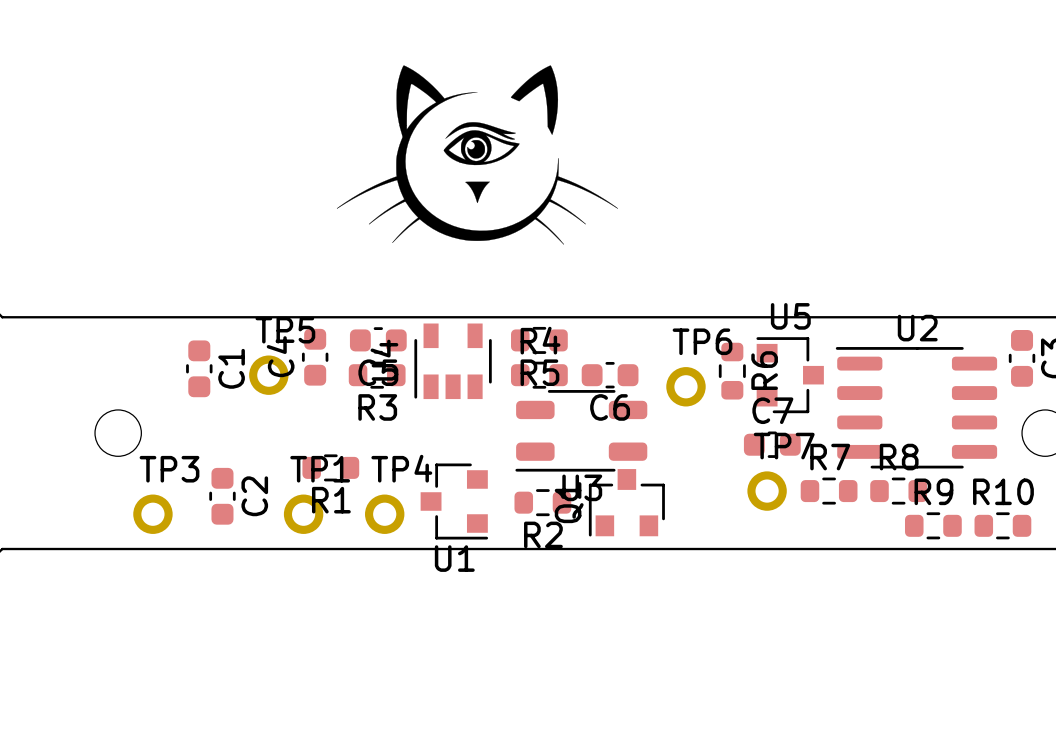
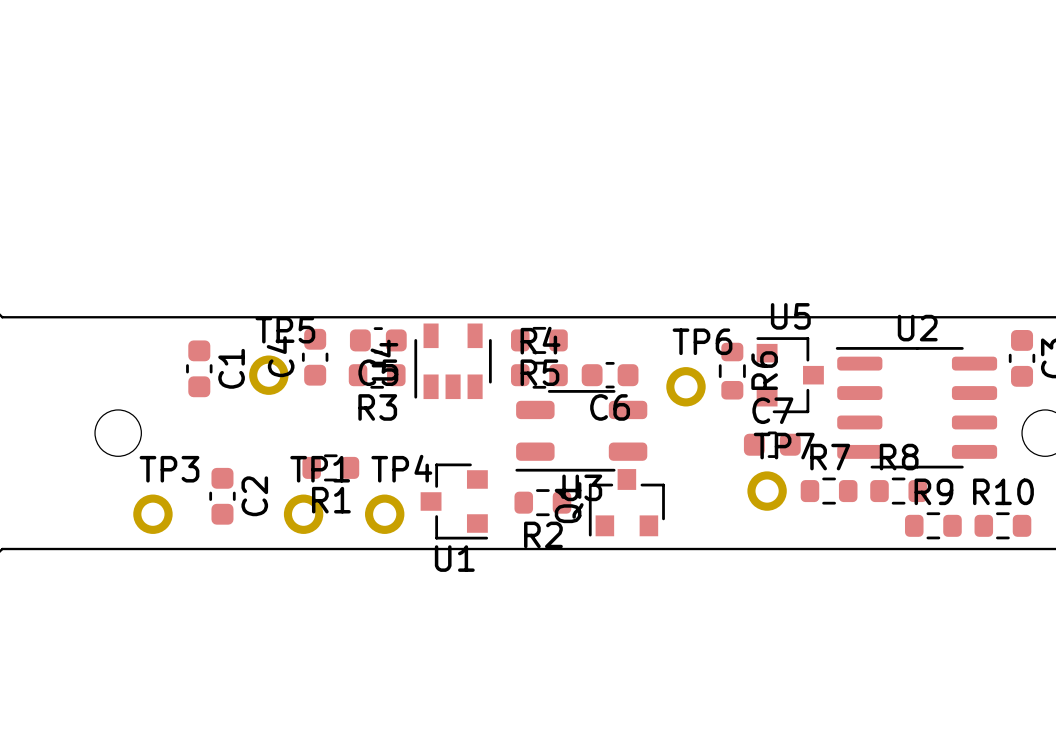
drawing: [336, 65, 618, 245] -> none

